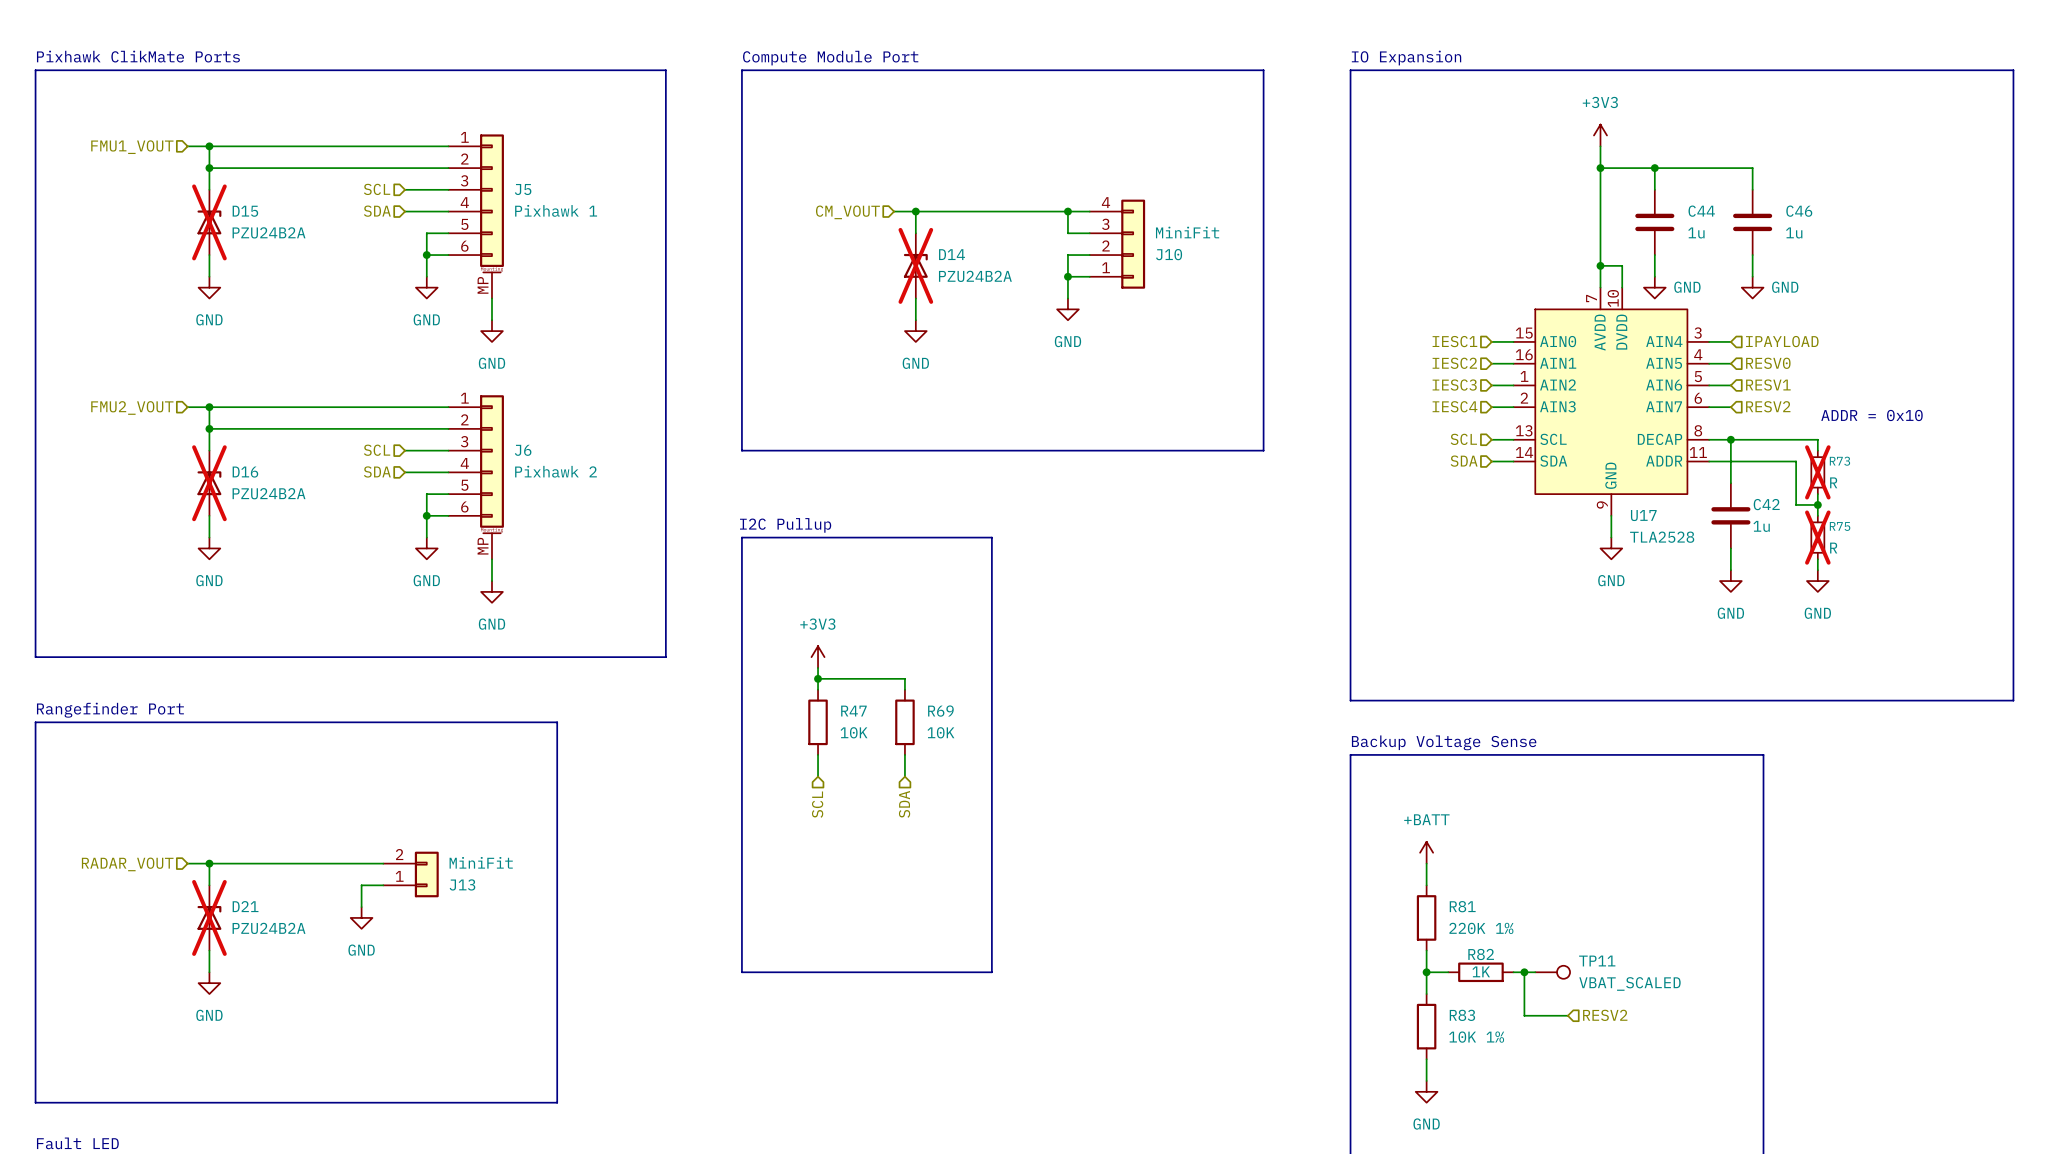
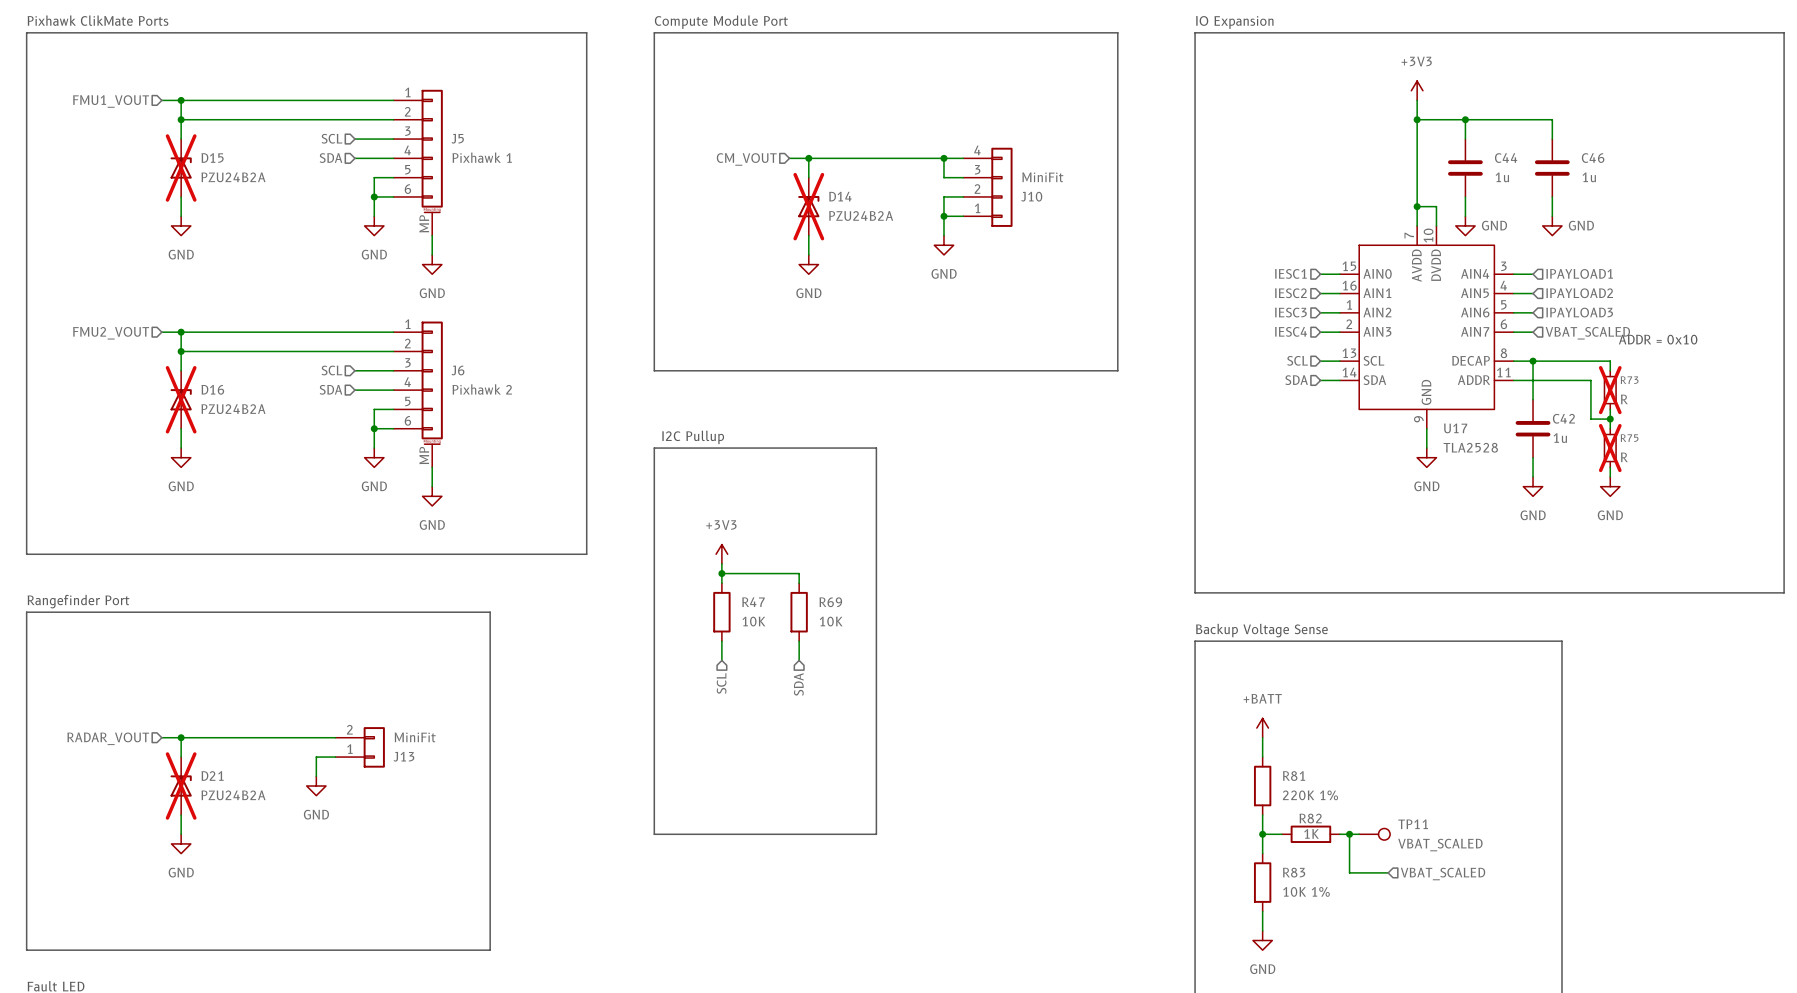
hierarchical label: IPAYLOAD (1782, 341) -> IPAYLOAD1 (1579, 273)
hierarchical label: RESV0 (1768, 363) -> IPAYLOAD2 (1579, 293)
hierarchical label: RESV1 (1768, 385) -> IPAYLOAD3 (1579, 312)
hierarchical label: RESV2 (1768, 406) -> VBAT_SCALED (1587, 333)
hierarchical label: RESV2 (1605, 1015) -> VBAT_SCALED (1443, 874)

